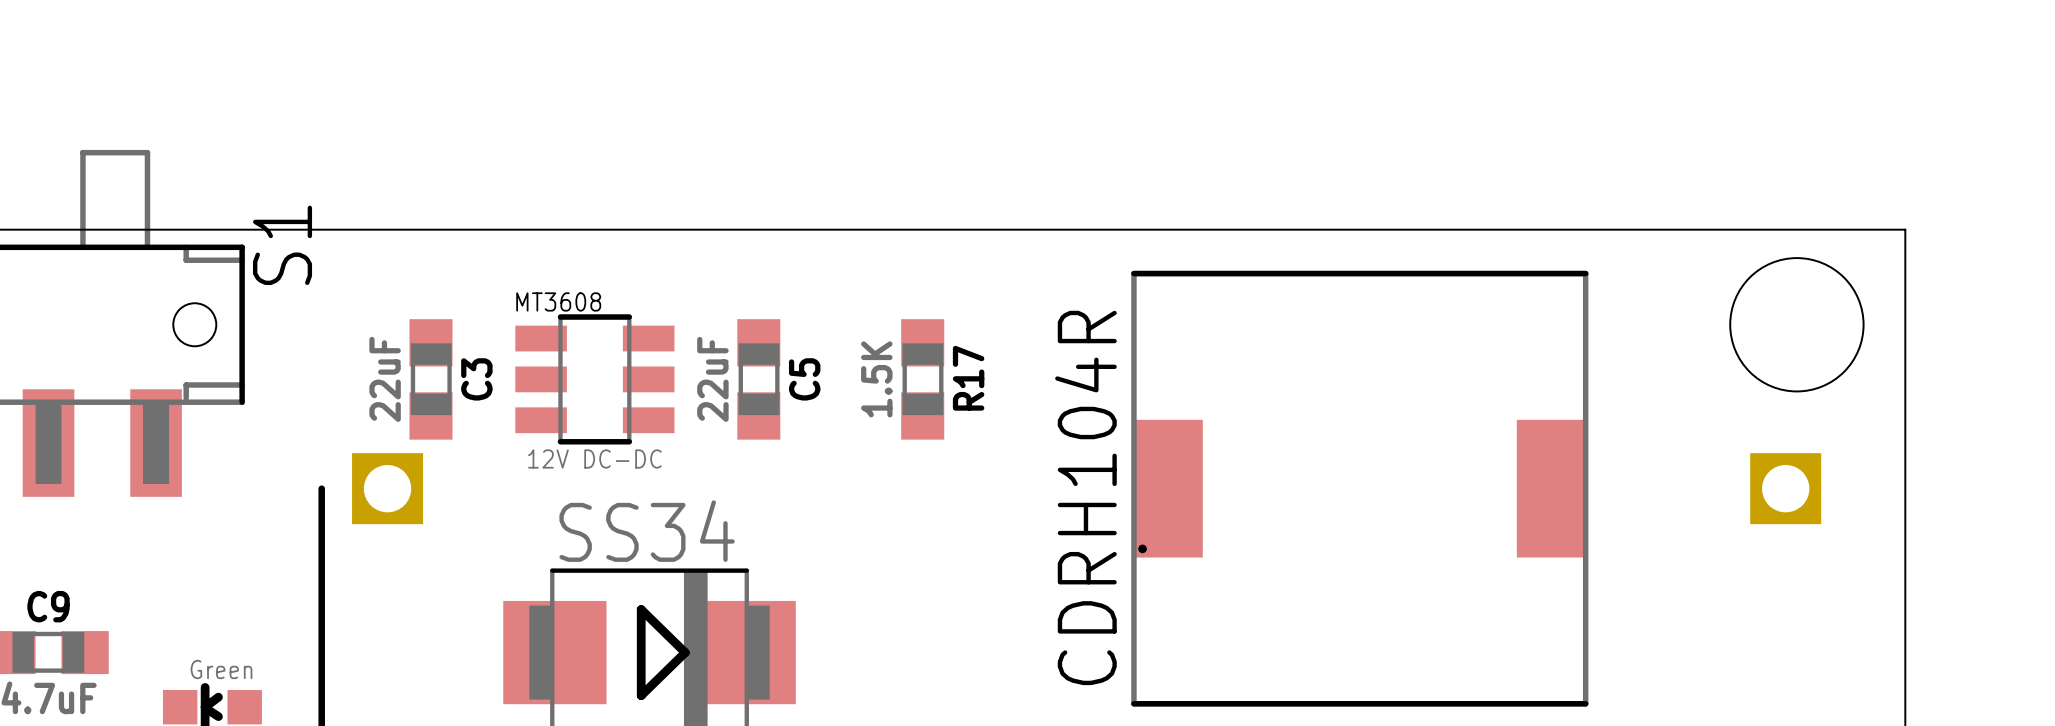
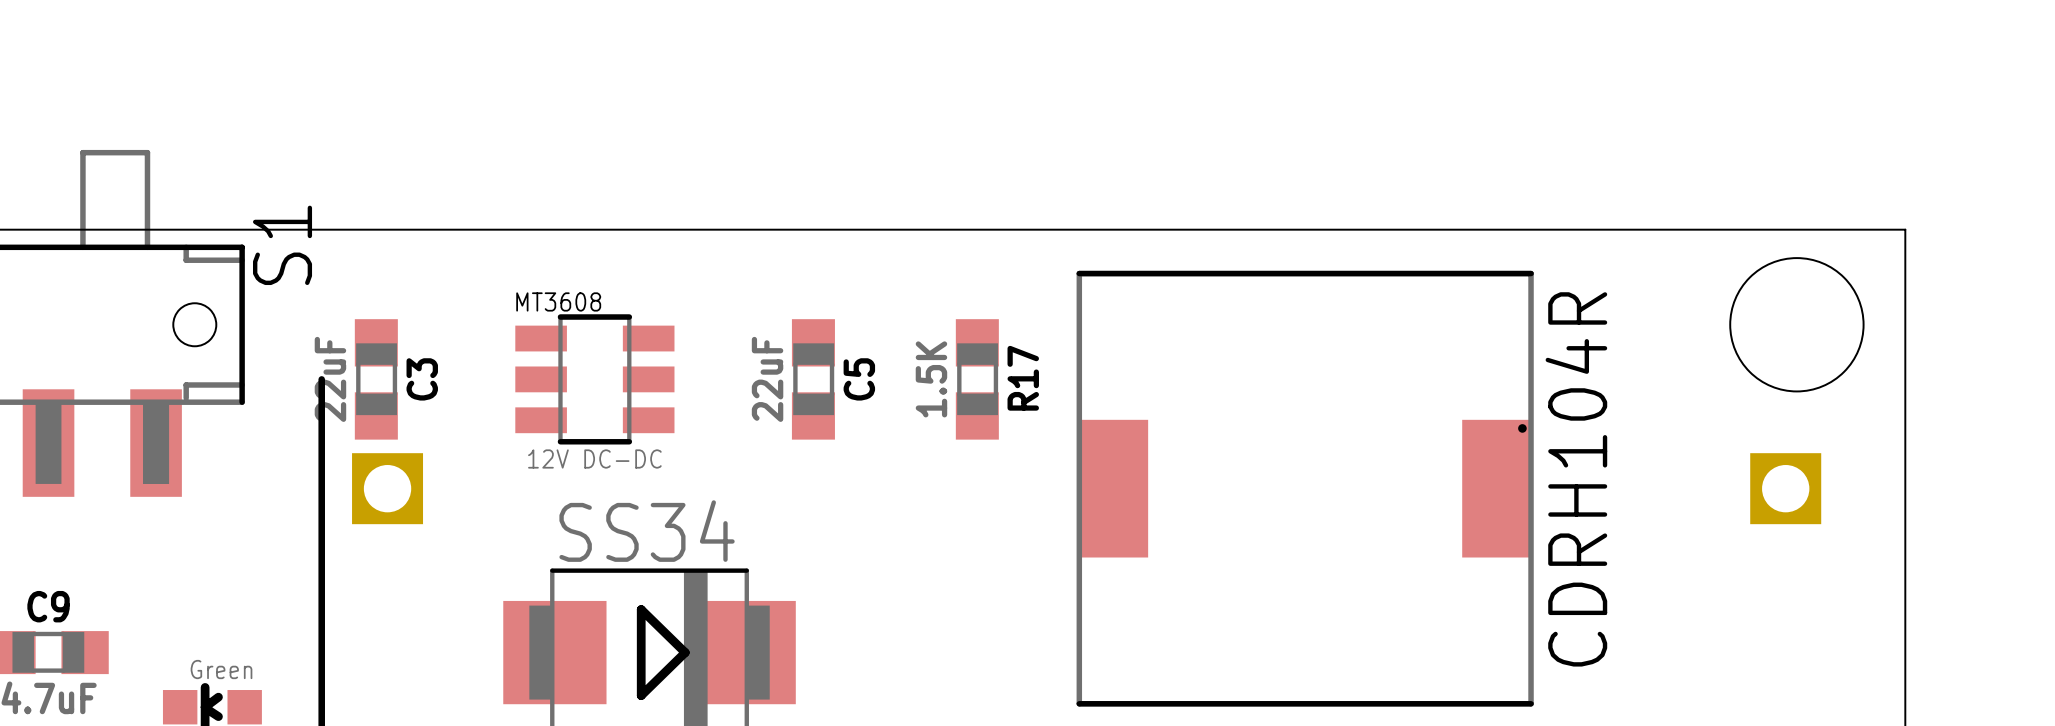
line: none -> (321, 379) (321, 488)
C3 position: (430, 379) -> (376, 379)
C5 position: (758, 379) -> (813, 379)
R17 position: (922, 379) -> (977, 379)
part: none -> (1305, 488)
part: (1359, 488) -> none

